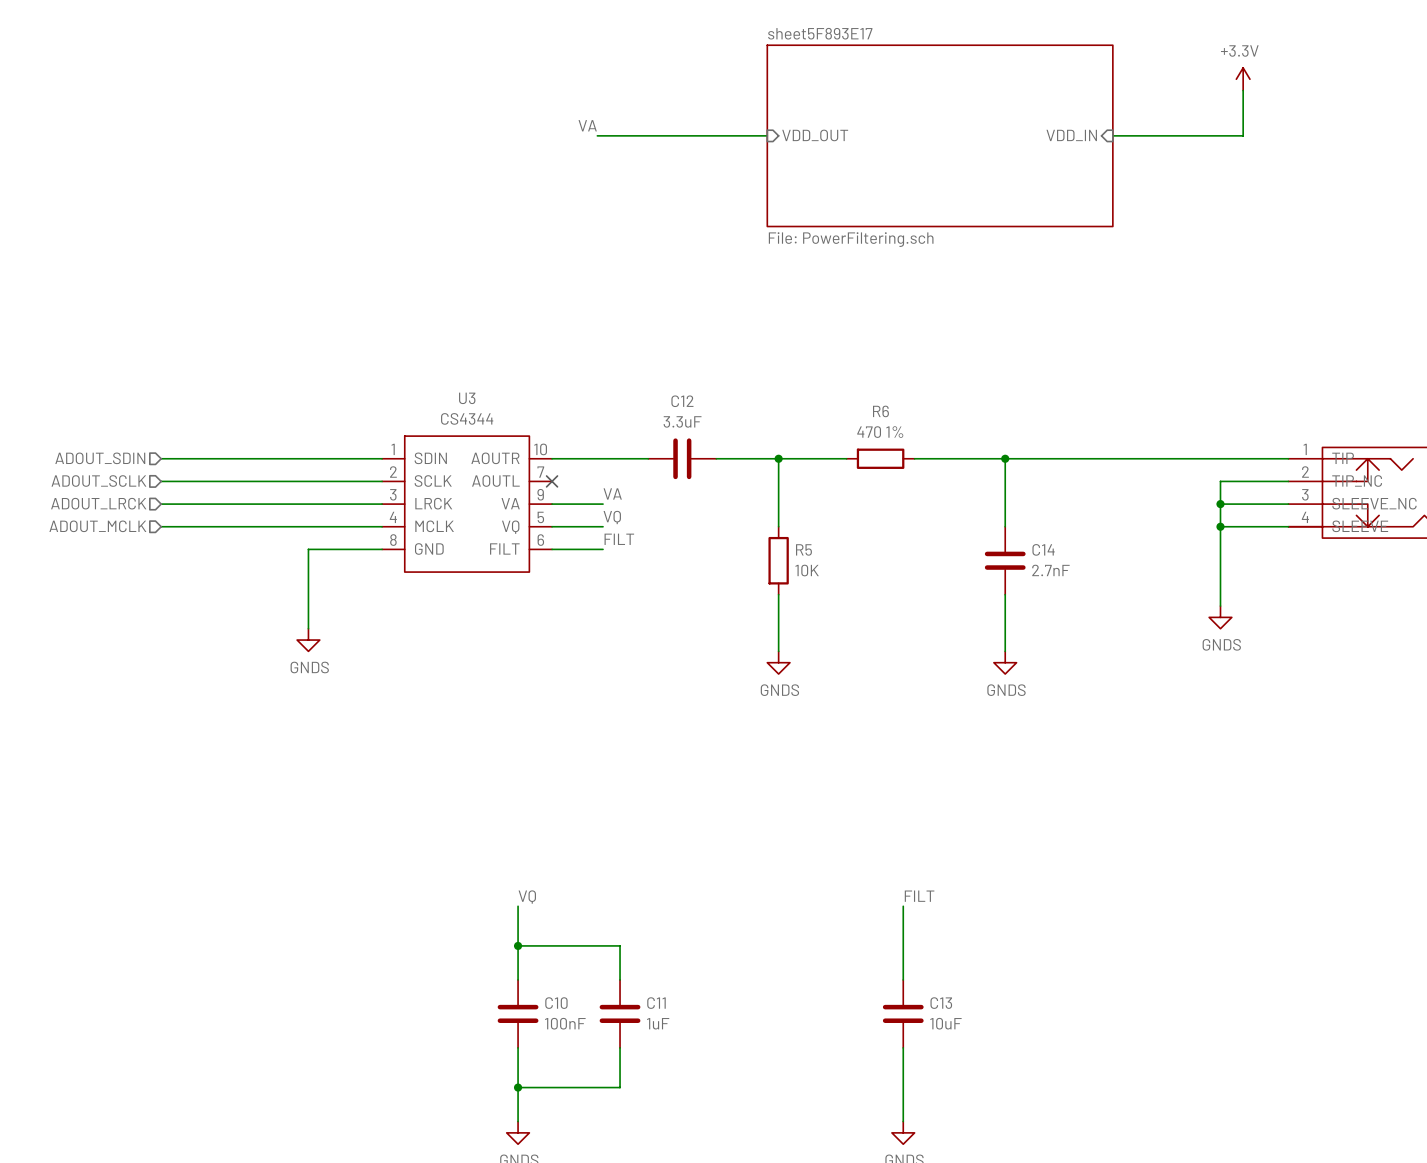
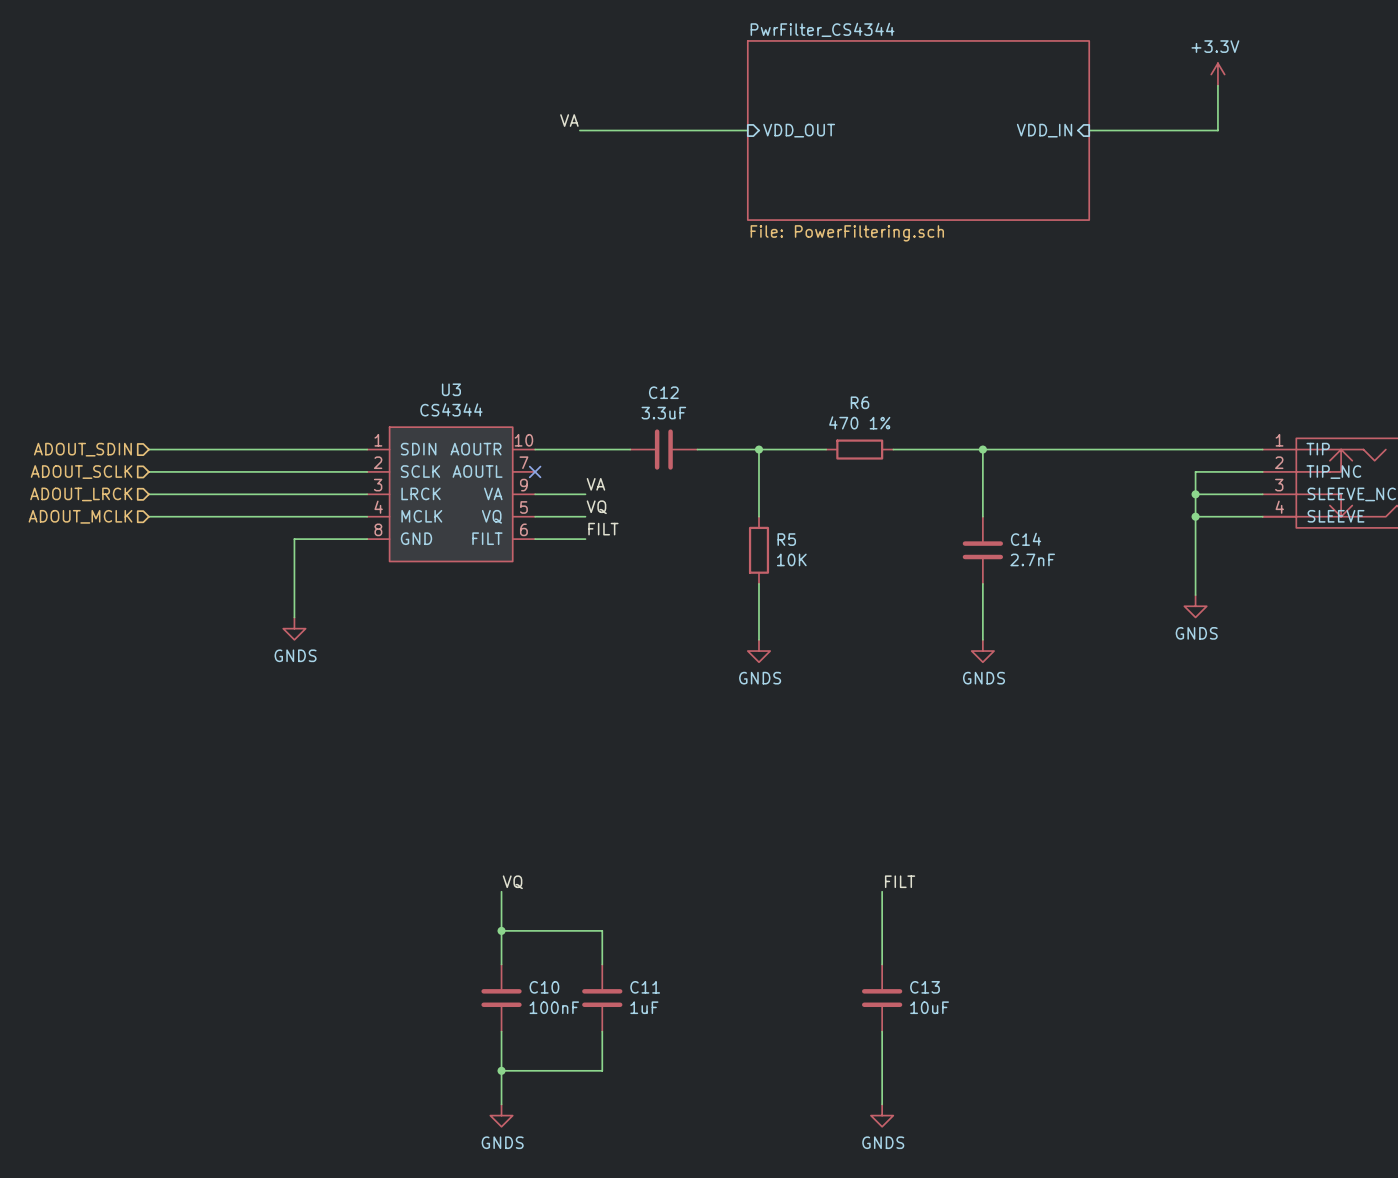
sheet sheet5F893E17 name: sheet5F893E17 (820, 33) -> PwrFilter_CS4344 (822, 29)

